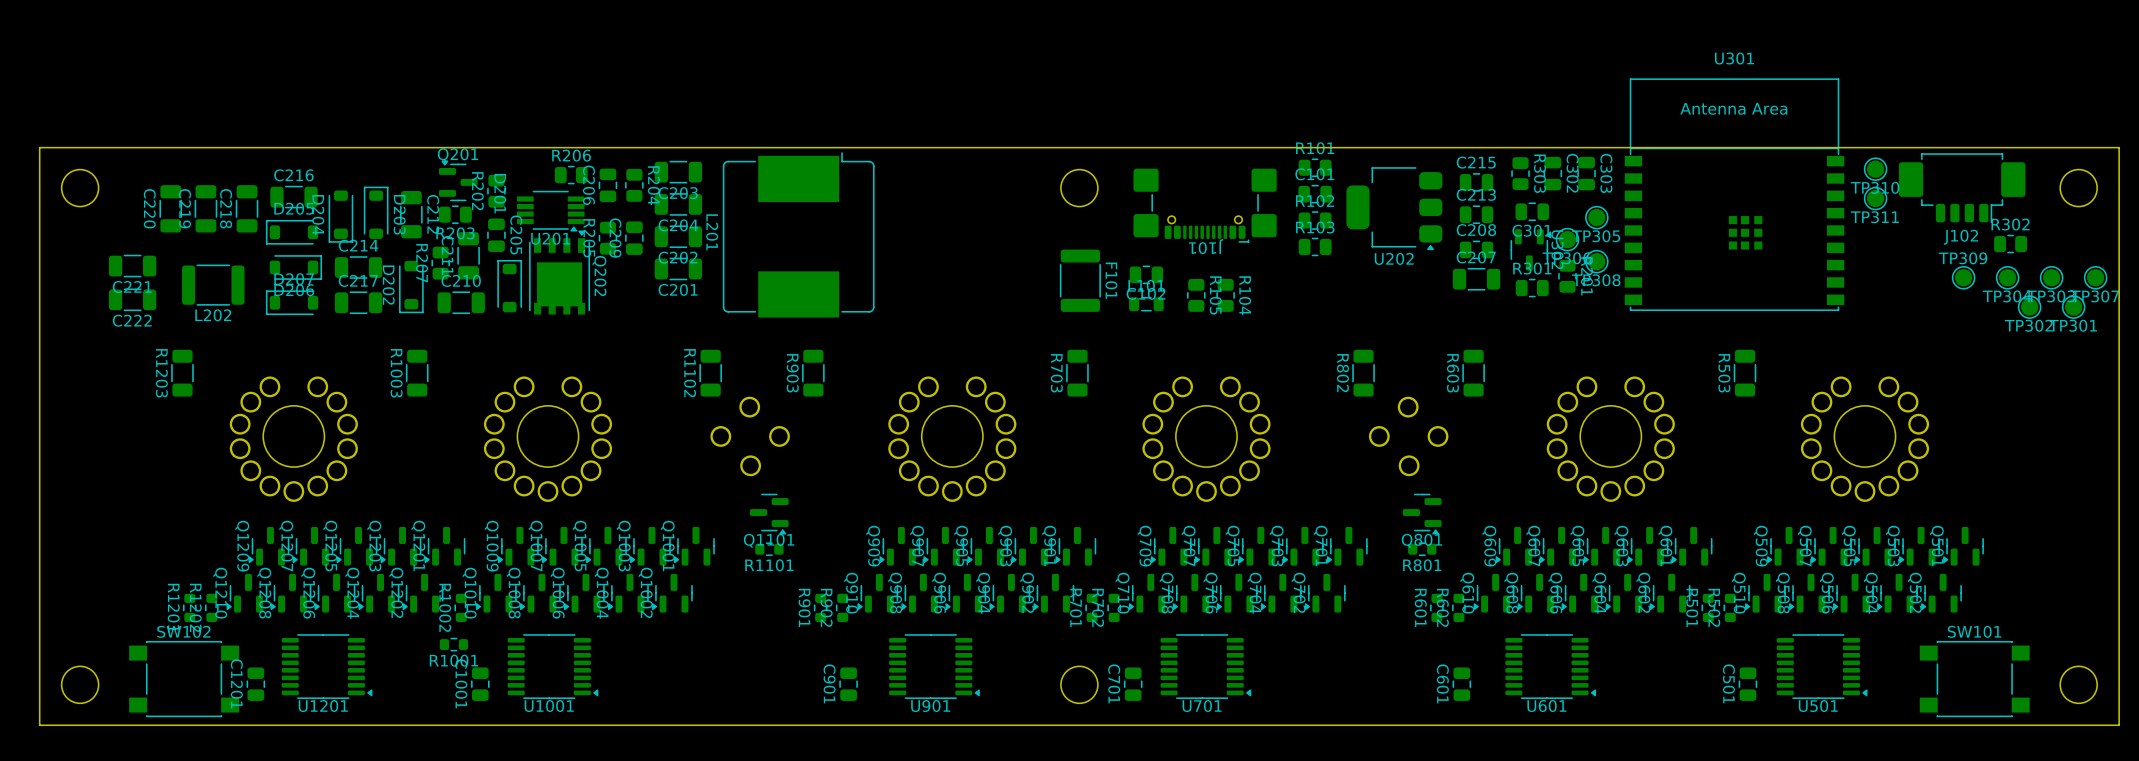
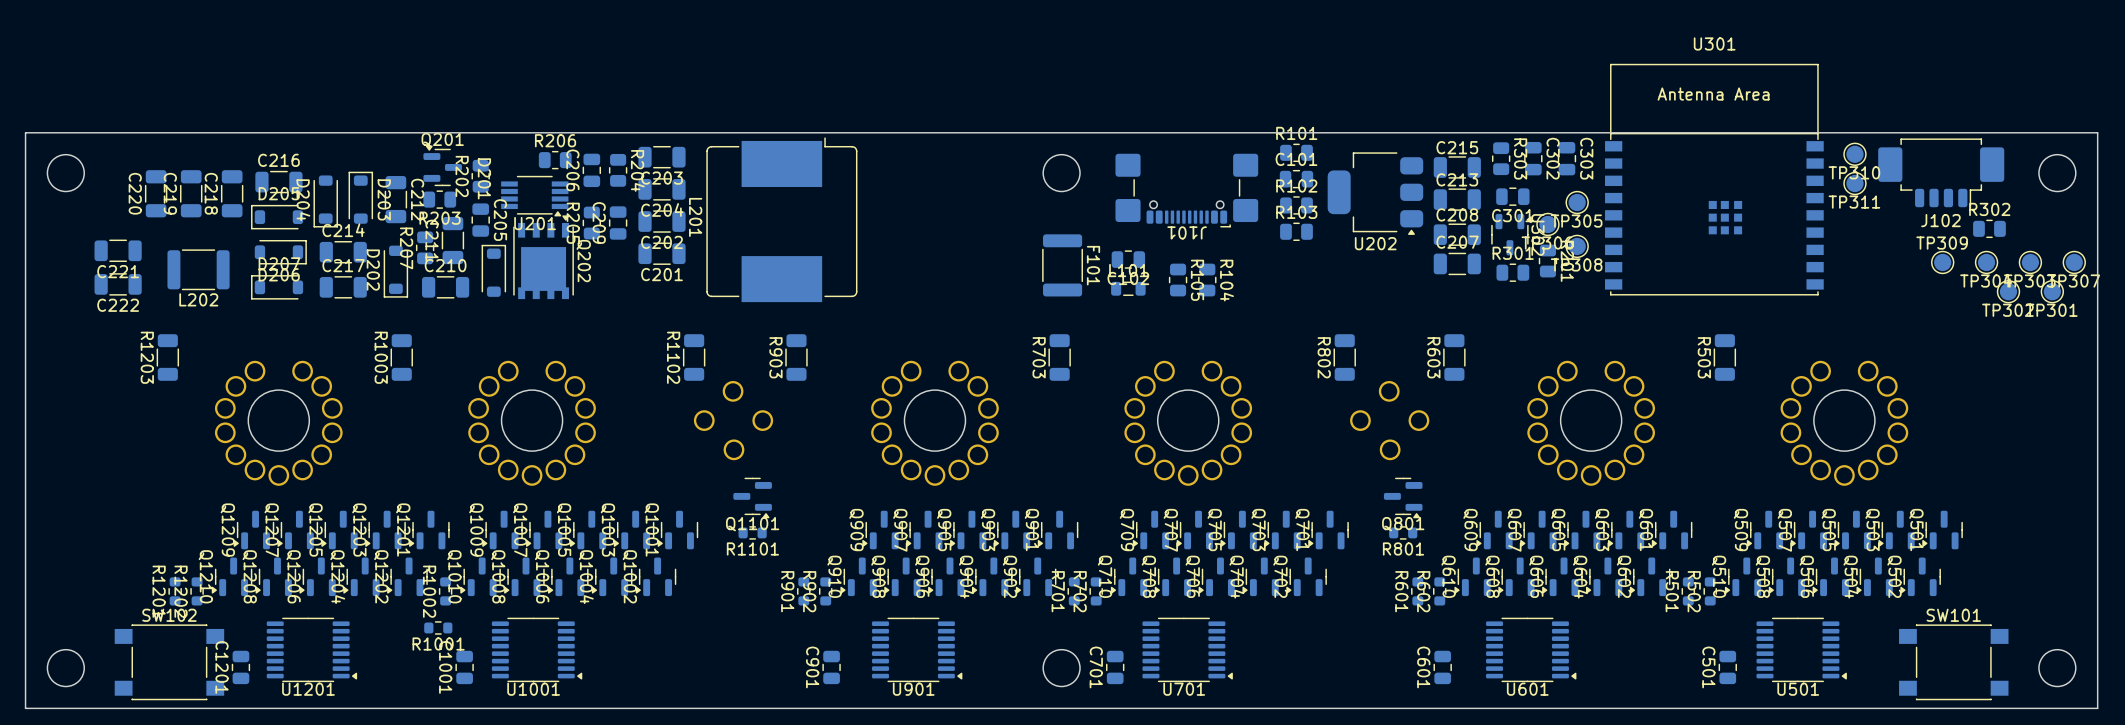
C215 footprint: [1459, 173, 1494, 192] -> [1433, 156, 1481, 179]
C213 footprint: [1459, 205, 1494, 224] -> [1433, 188, 1481, 211]
C208 footprint: [1459, 240, 1494, 260] -> [1433, 223, 1481, 246]

